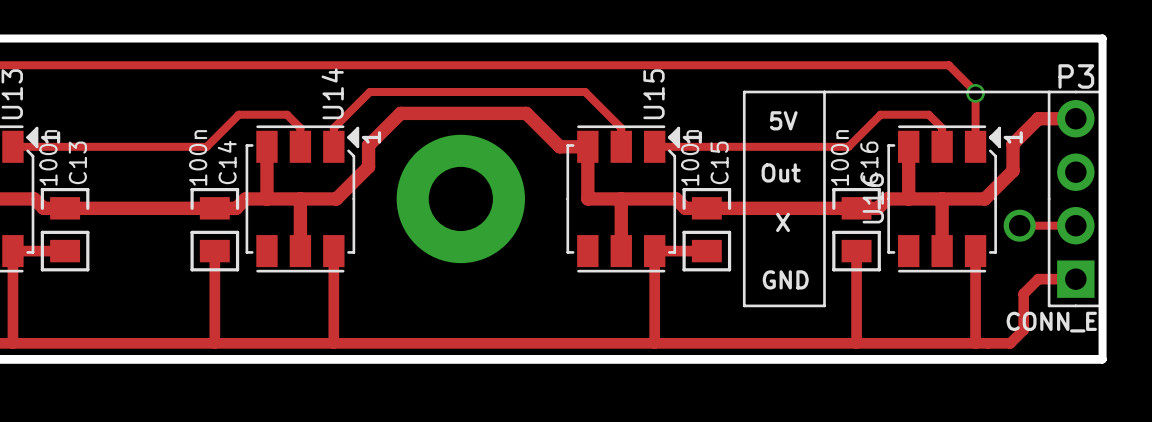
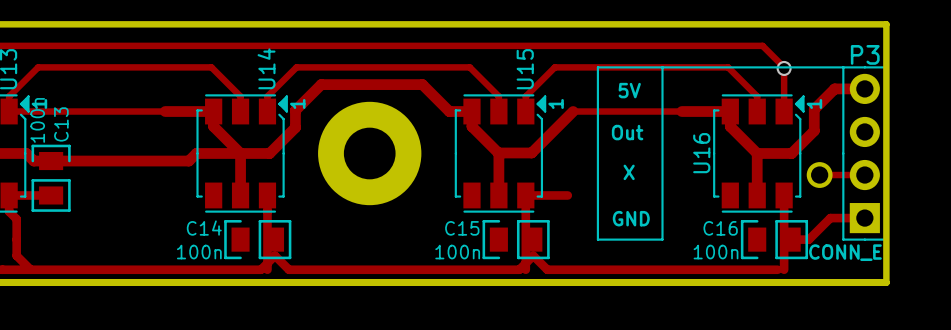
track: (287, 114) (238, 114) (206, 146) -> (213, 111) (165, 111)
track: none -> (229, 85) (211, 67) (38, 67) (9, 96) (9, 111)
track: (928, 114) (880, 114) (848, 146) -> (730, 111) (681, 111)
track: none -> (746, 85) (728, 67) (554, 67) (525, 96) (525, 111)
track: (654, 146) (713, 146) -> (498, 152) (531, 152) (573, 111)
track: (266, 165) (266, 198) -> (213, 126) (240, 153)
track: (587, 165) (587, 198) (676, 198) (685, 208) (877, 208) (887, 198) (942, 198) -> (471, 126) (498, 153)
track: (908, 165) (908, 198) -> (730, 126) (757, 153)
C14 rotation: 0° (214, 229) -> 90° counterclockwise (257, 239)
C14 position: (214, 229) -> (257, 239)
C15 rotation: 0° (706, 229) -> 90° counterclockwise (516, 239)
C15 position: (706, 229) -> (516, 239)
C16 rotation: 0° (856, 229) -> 90° counterclockwise (774, 239)
C16 position: (856, 229) -> (774, 239)
track: (214, 251) (214, 343) -> none
track: (856, 251) (856, 343) -> none
track: (12, 271) (12, 343) -> (9, 211) (16, 219) (16, 255) (30, 269)
track: (1038, 279) (1023, 293) (1023, 329) (1010, 343) (967, 343) -> (834, 218) (830, 218) (808, 239) (791, 239)
track: (325, 343) (360, 343) -> (261, 269) (275, 255) (288, 269)
track: (646, 343) (681, 343) -> (519, 269) (533, 255) (547, 269)

